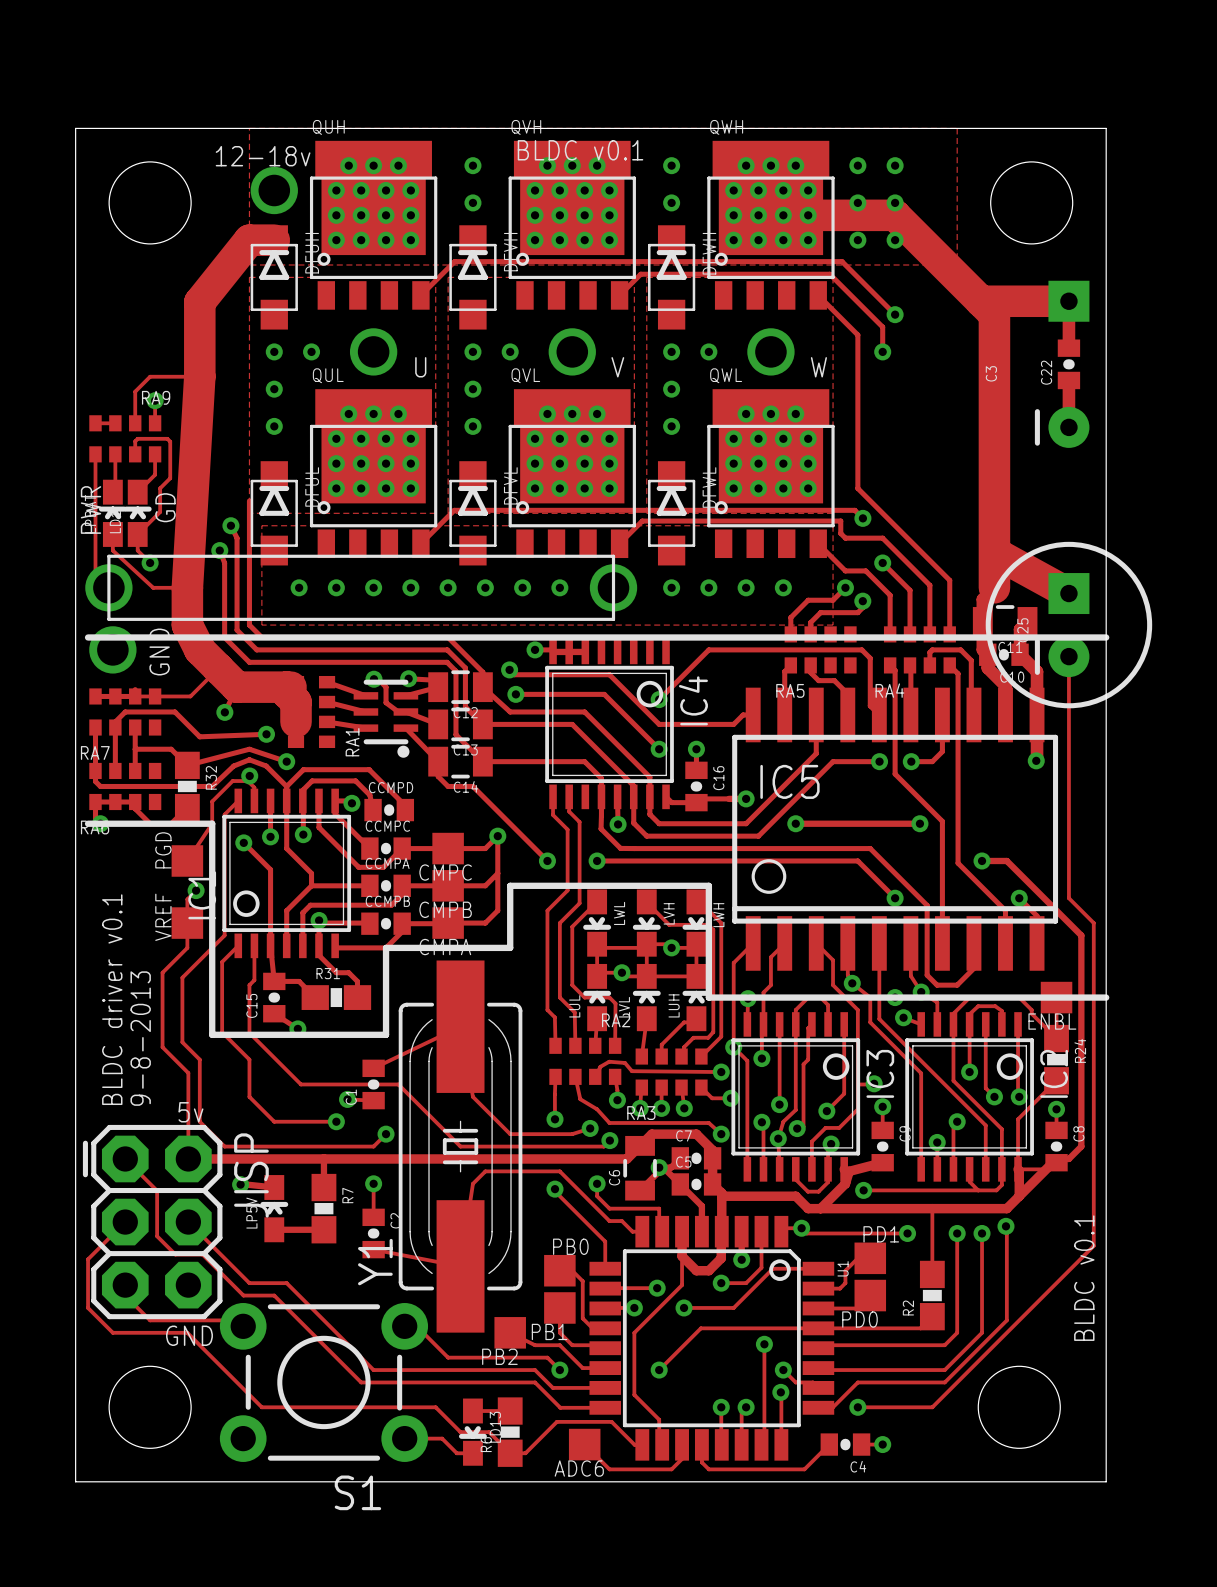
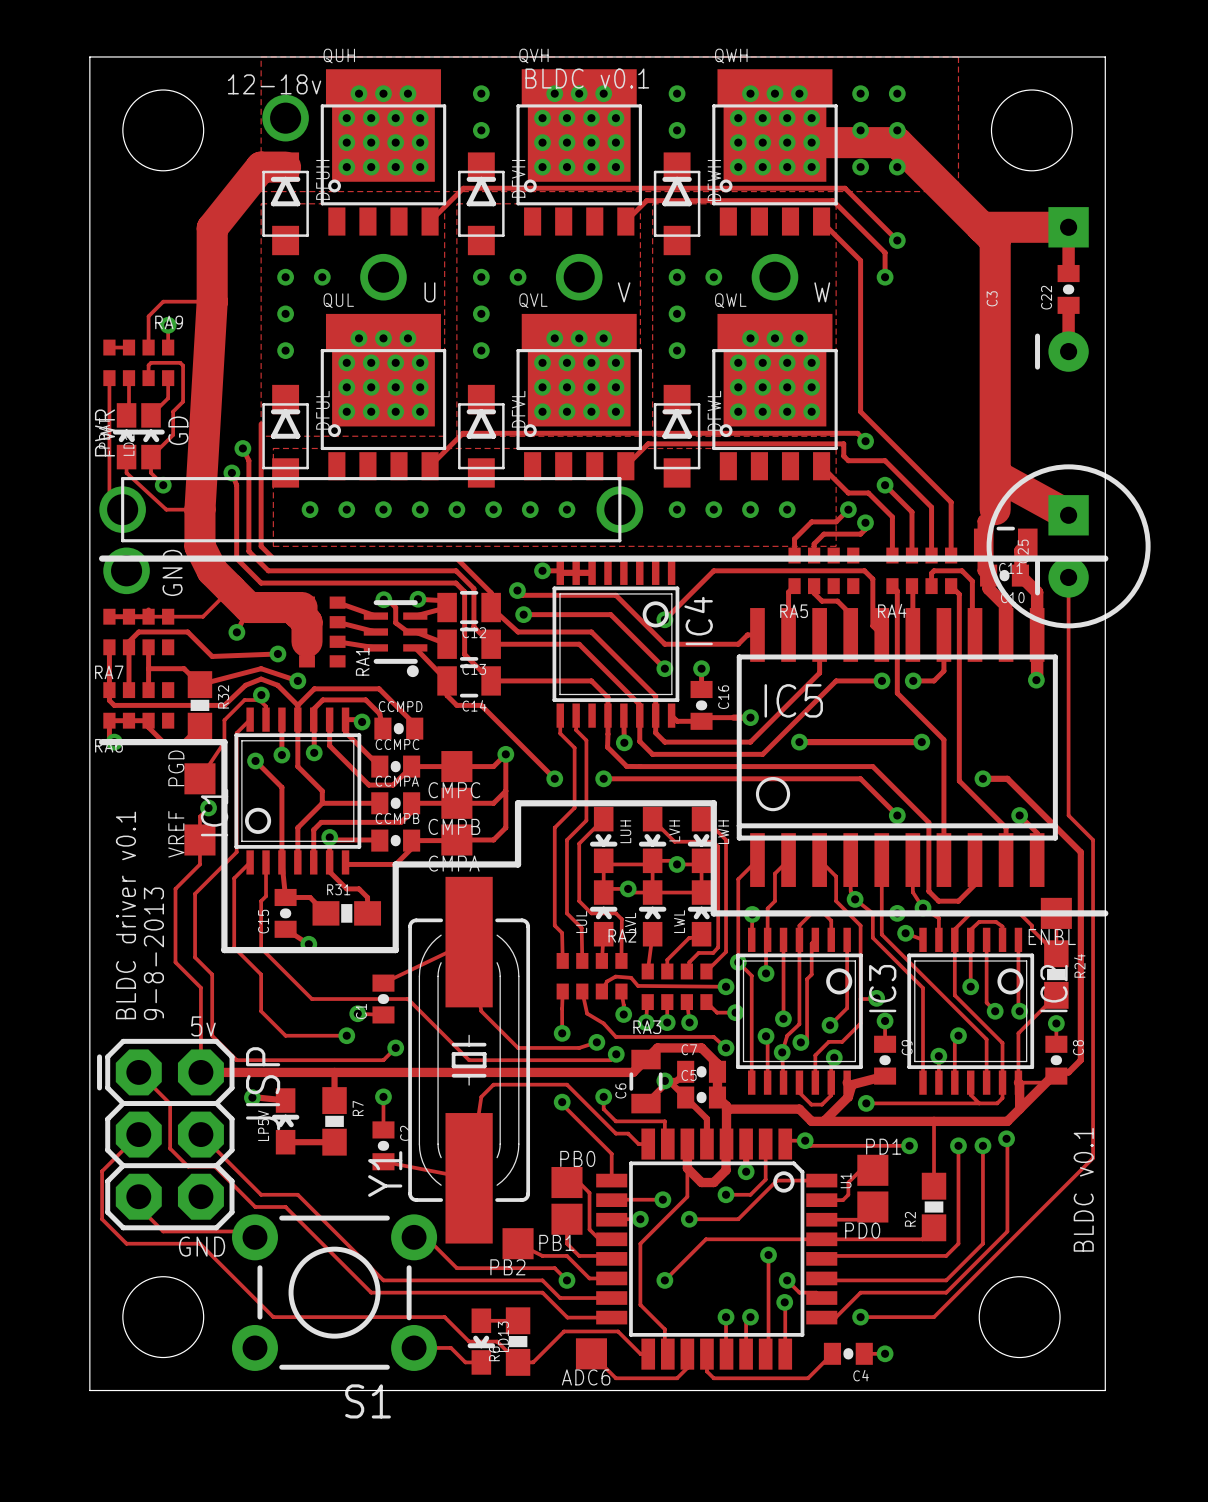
LWL name: LWL (619, 913) -> LUH (625, 831)
LUH name: LUH (674, 1005) -> LWL (679, 921)

